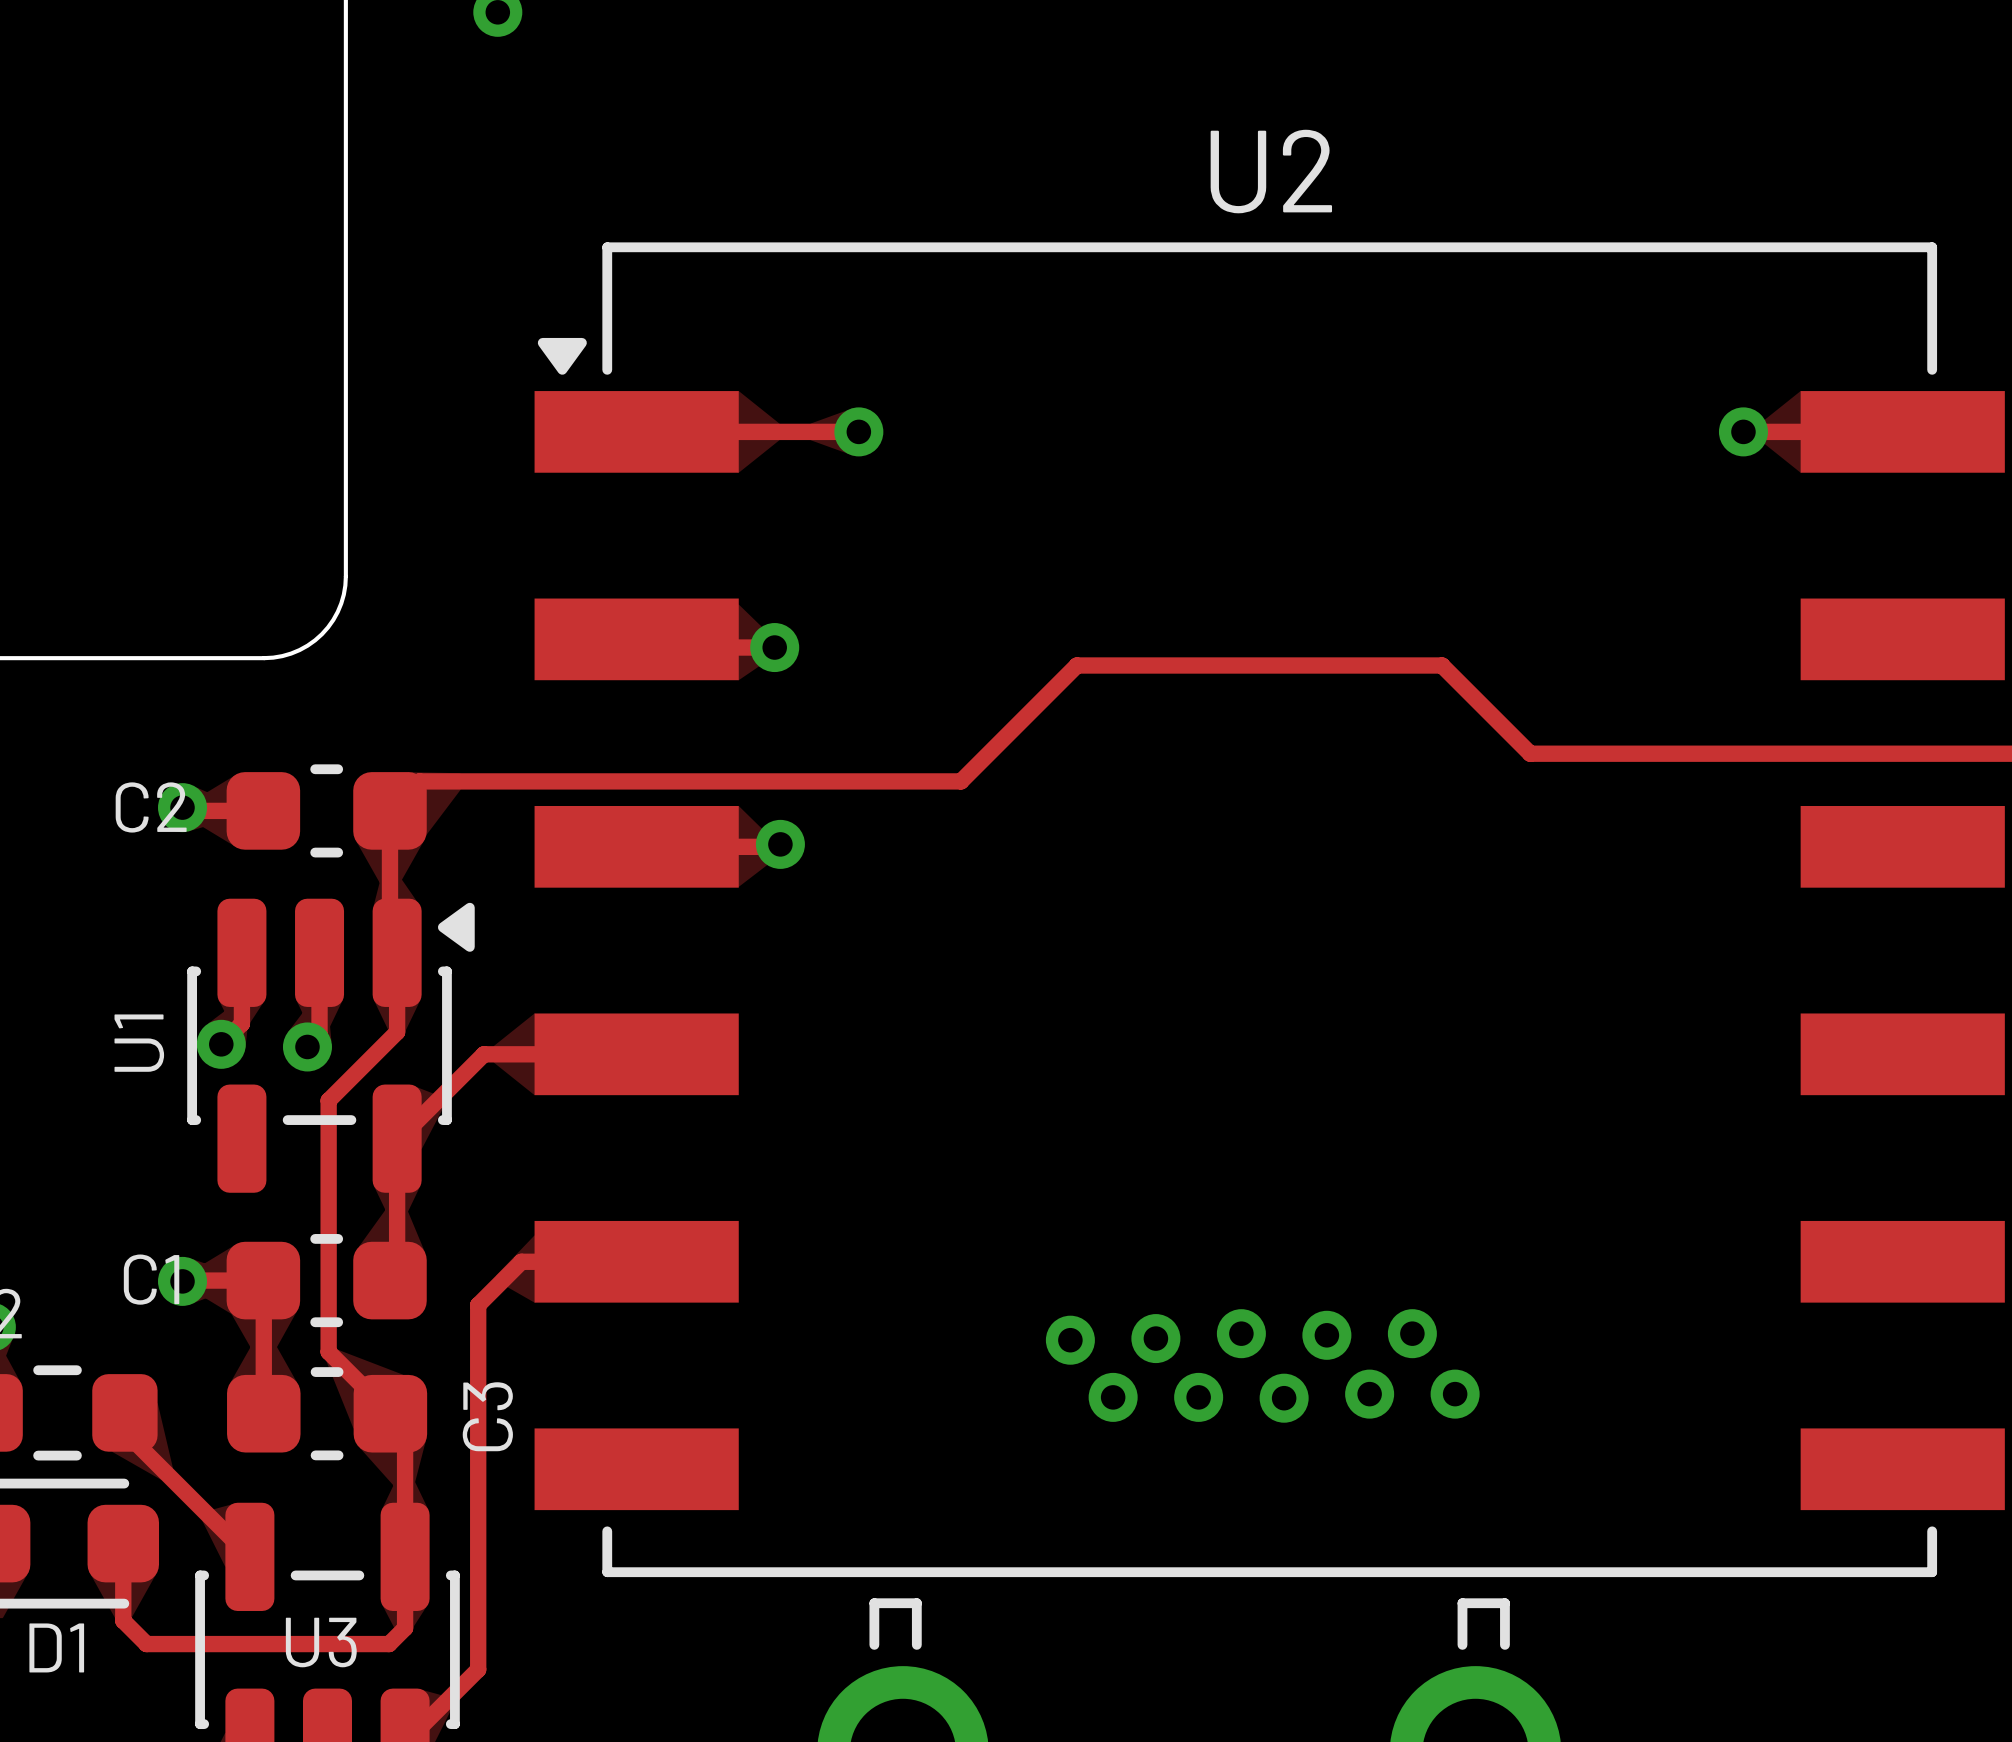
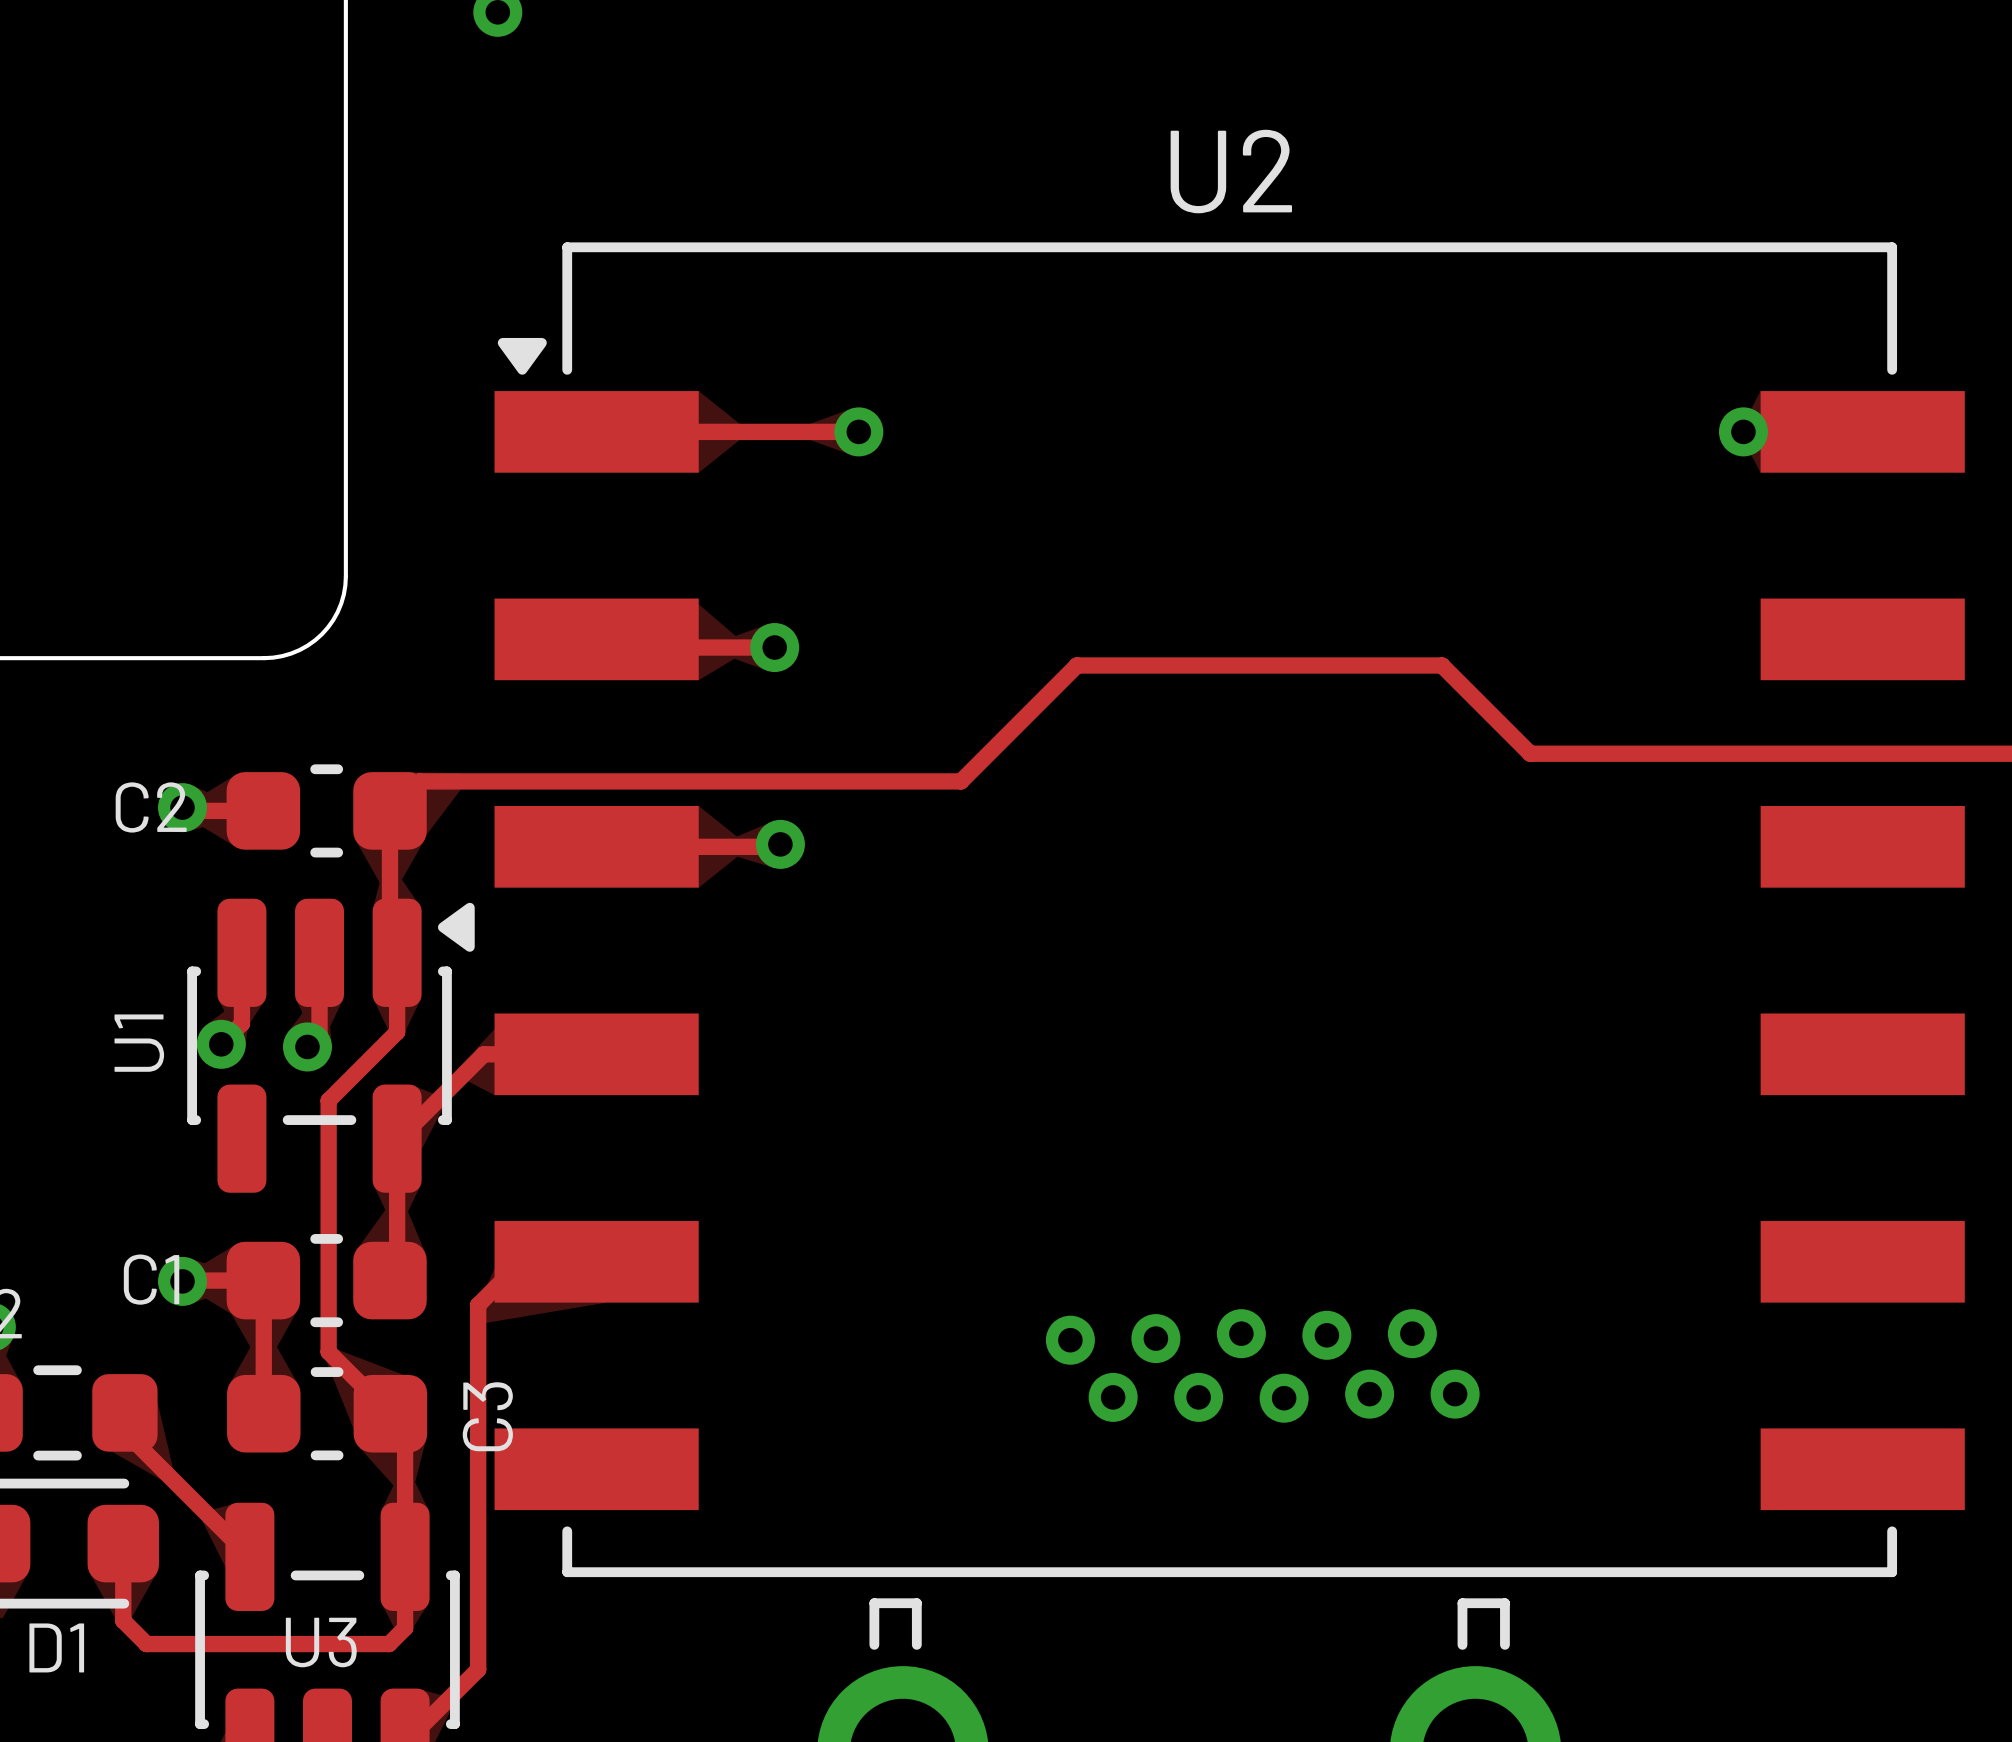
U2 position: (1269, 909) -> (1229, 909)

